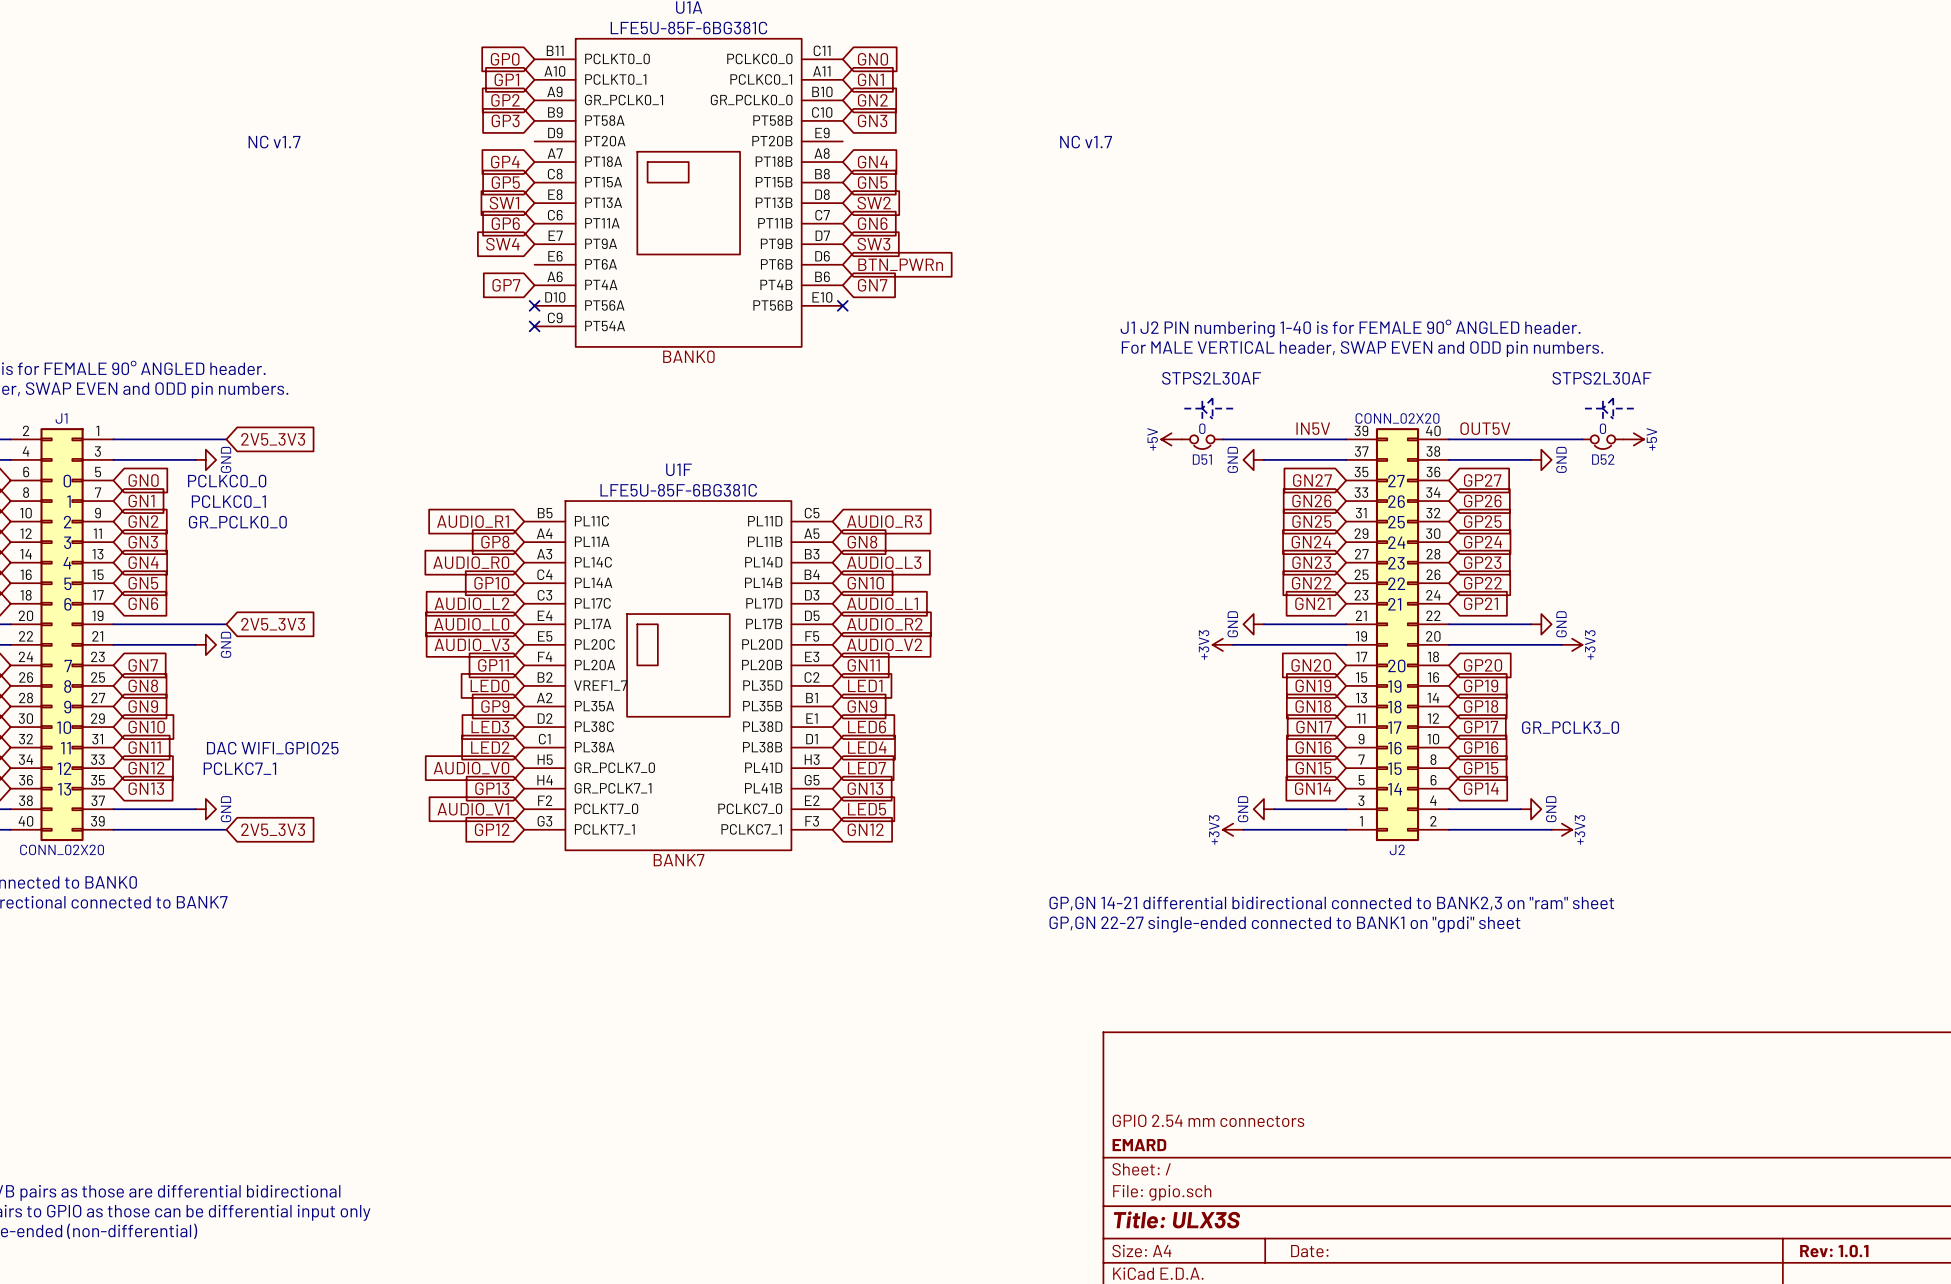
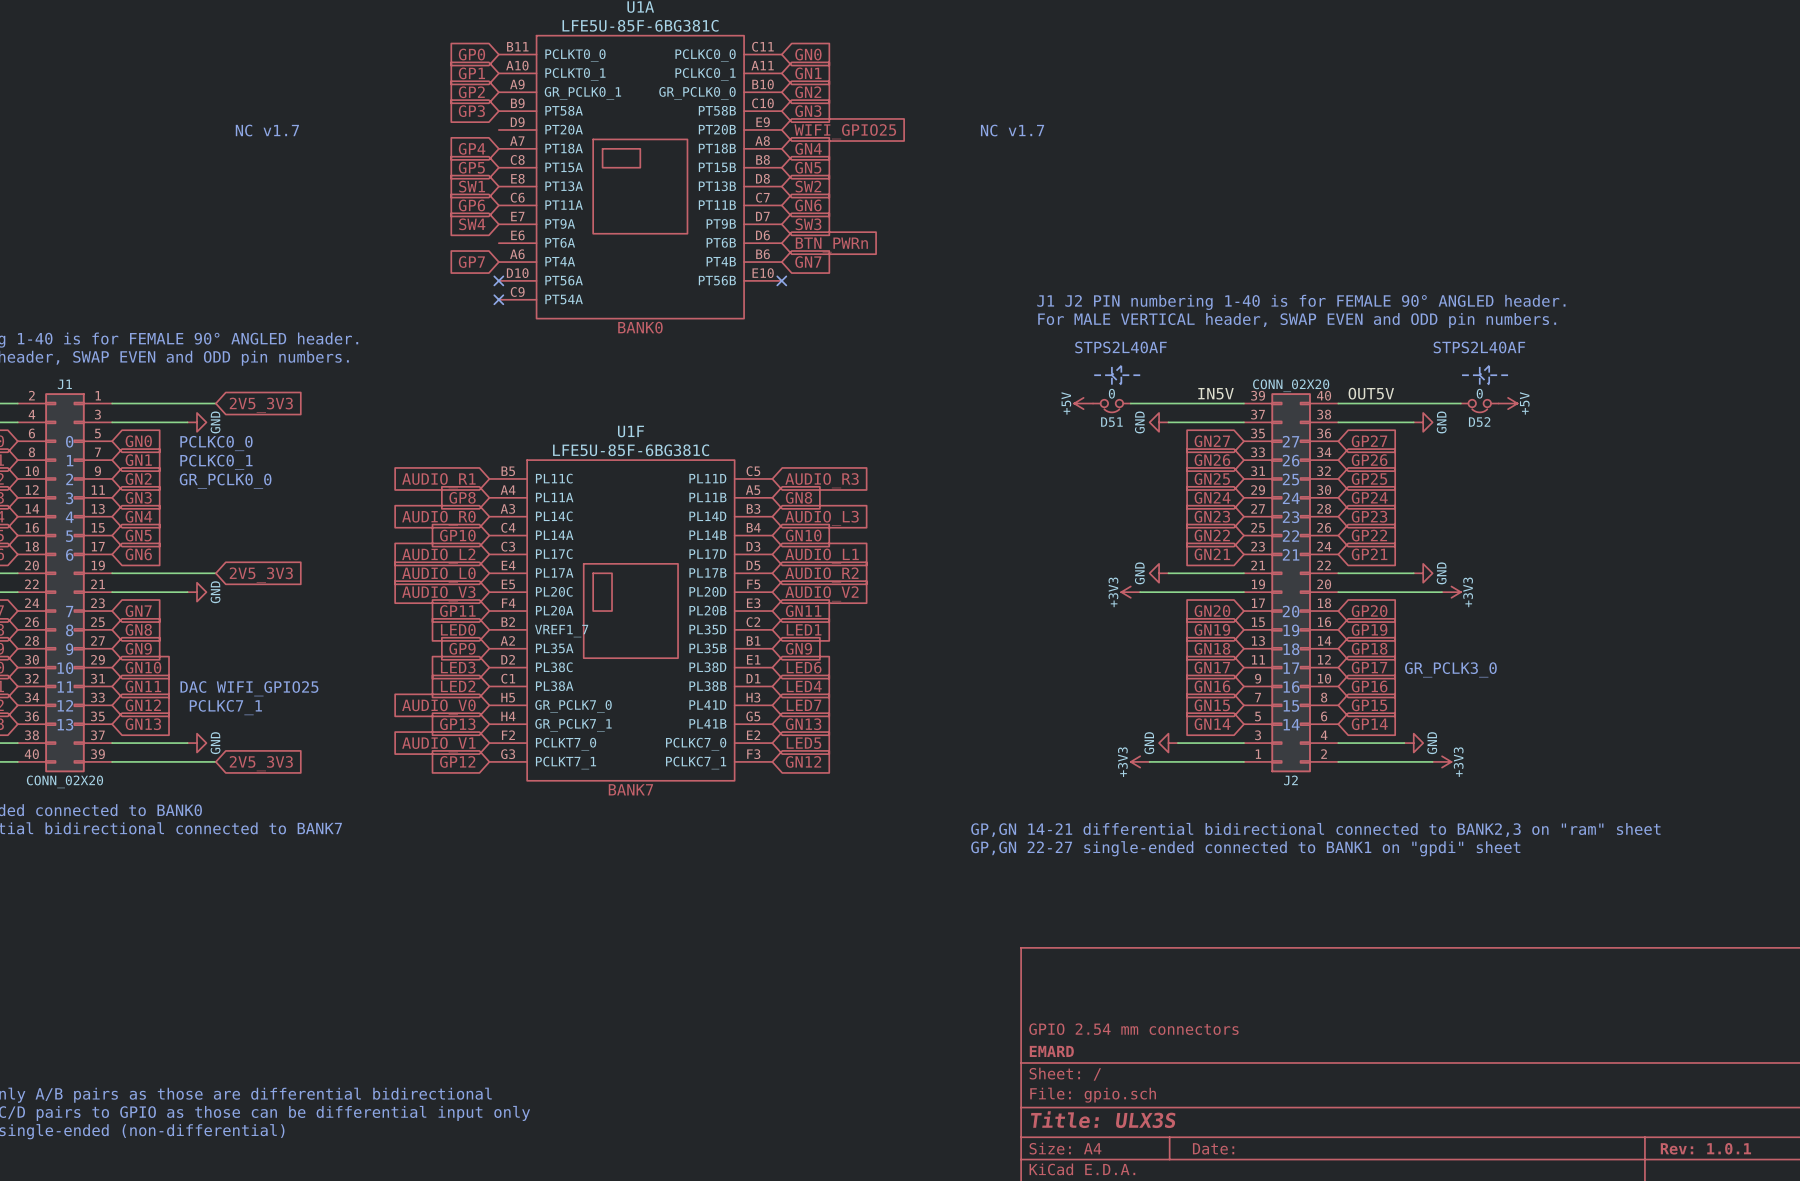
global label: none -> WIFI_GPIO25 (845, 131)
text: STPS2L30AF (1211, 378) -> STPS2L40AF (1120, 347)
text: STPS2L30AF (1601, 378) -> STPS2L40AF (1479, 347)

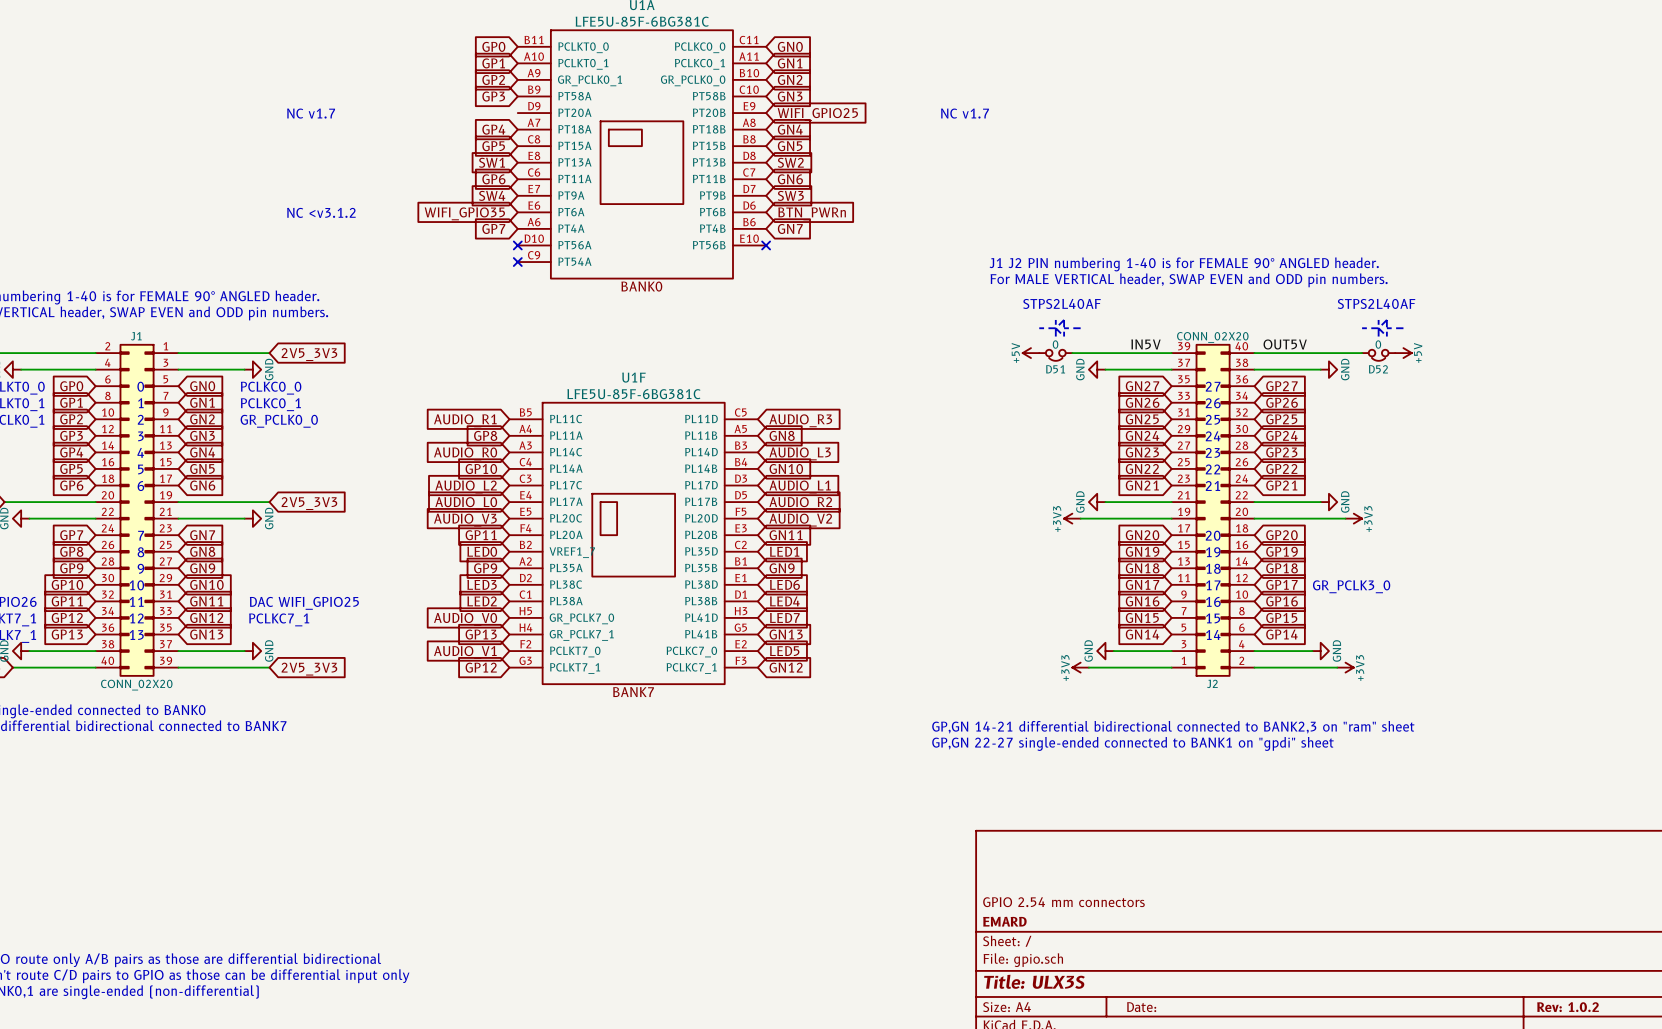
text: none -> NC <v3.1.2 (321, 212)
global label: none -> WIFI_GPIO35 (464, 213)
title block: Rev: 1.0.1 (1705, 1148) -> Rev: 1.0.2 (1568, 1007)

